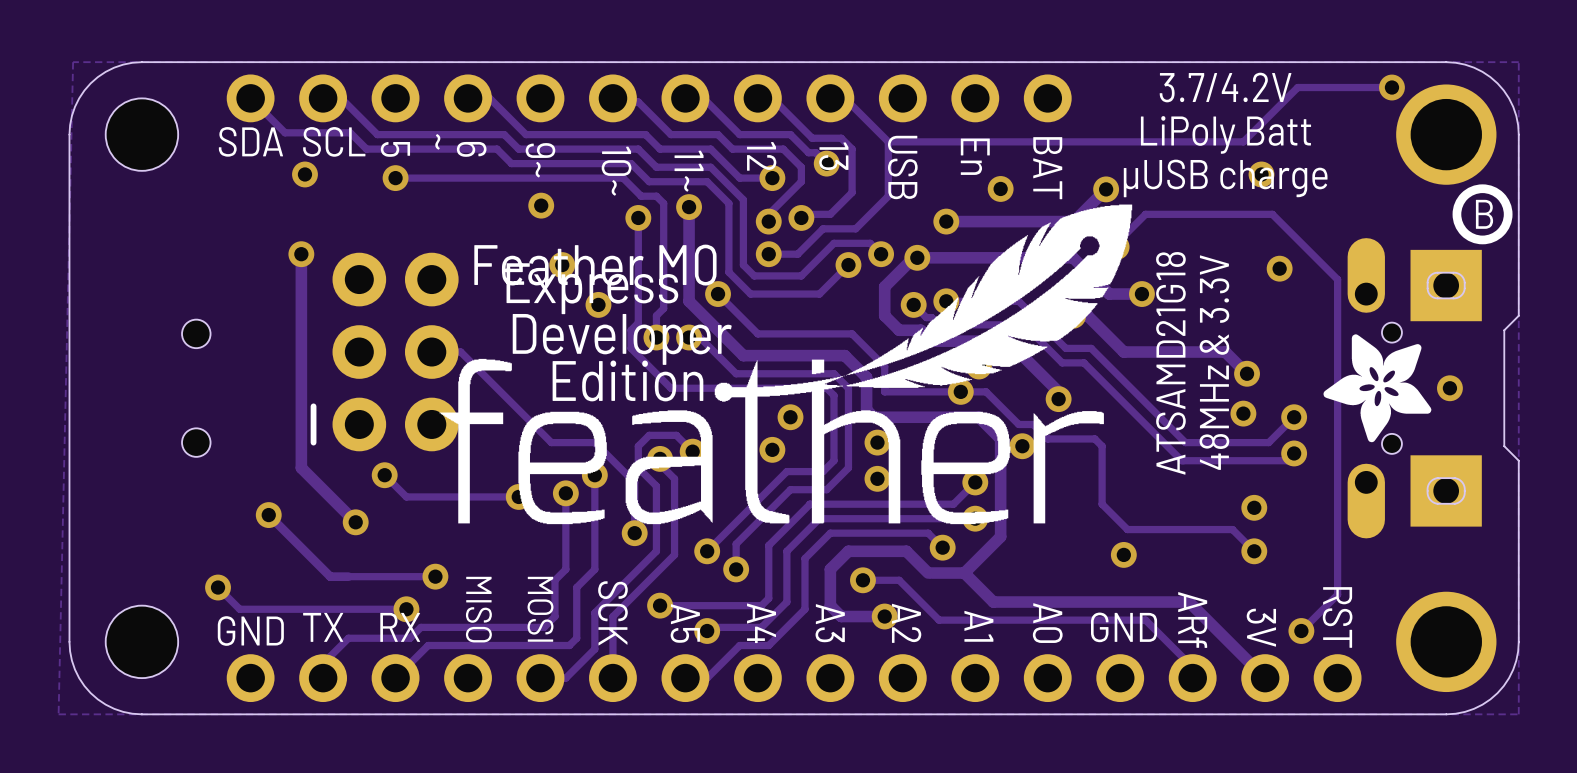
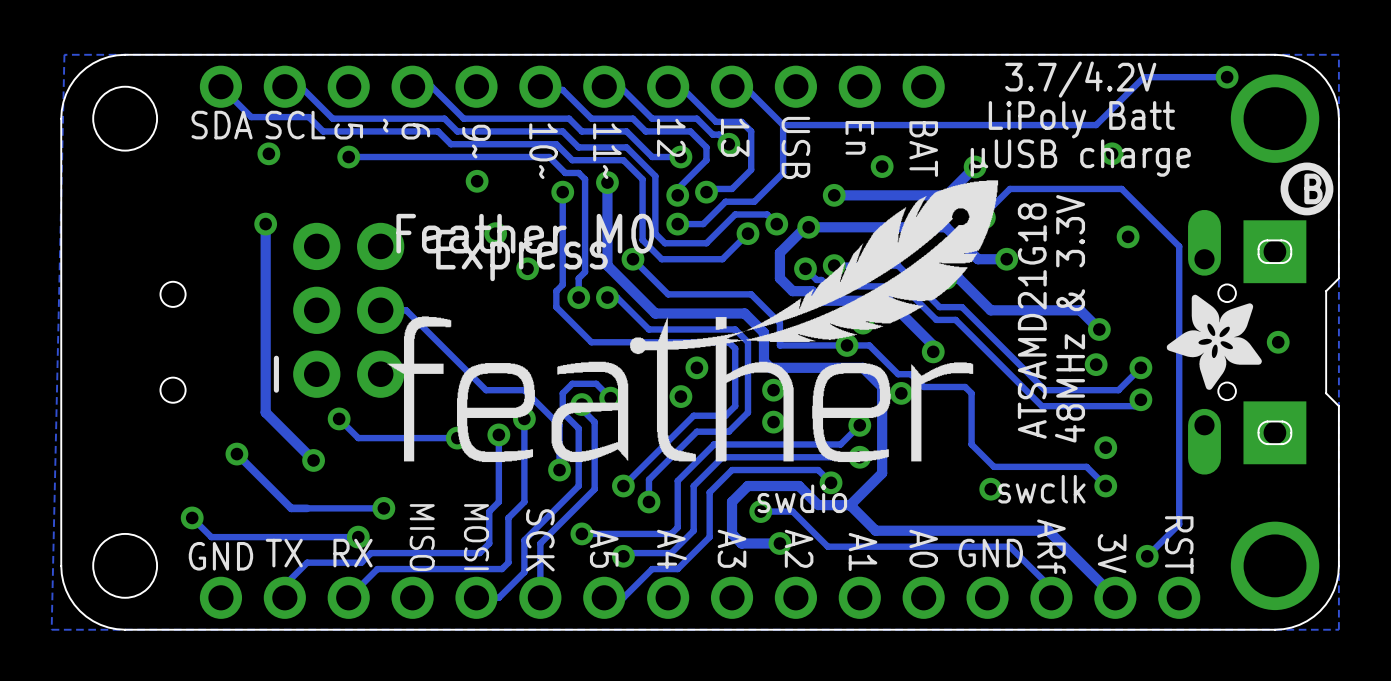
text: Developer (622, 339) -> none
text: Edition (627, 380) -> none
text: none -> swclk (1041, 489)
text: none -> swdio (802, 498)

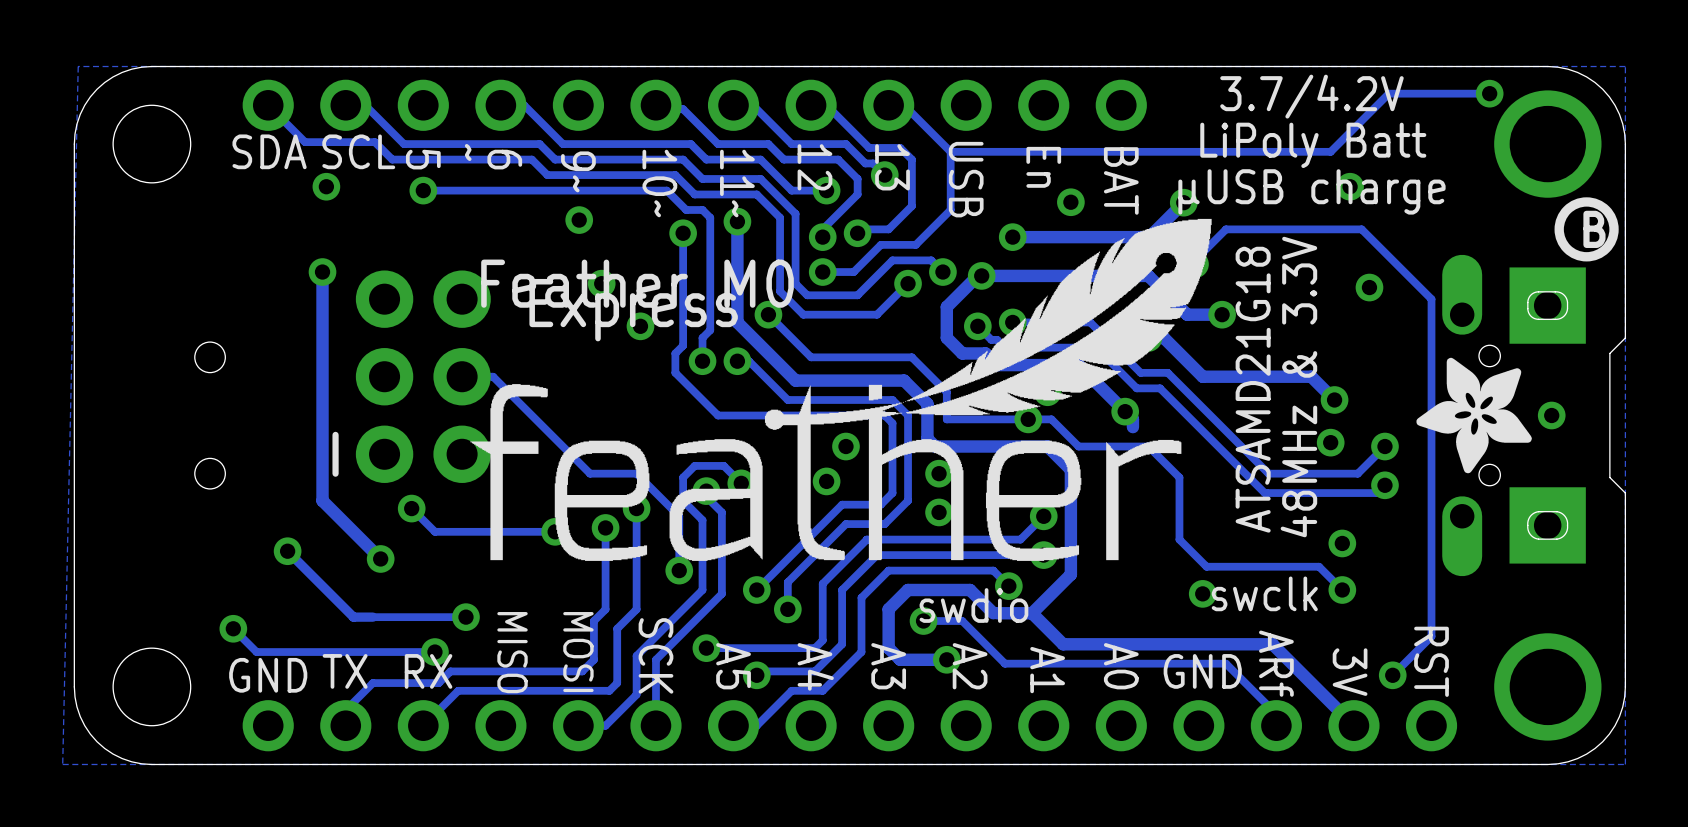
track: (866, 345) (869, 345) (898, 374) (910, 374) (923, 386) (965, 386) -> (1051, 419) (1078, 446) (1148, 446) (1171, 469)
via position: (933, 351) -> (1125, 411)
via: (901, 393) -> none

